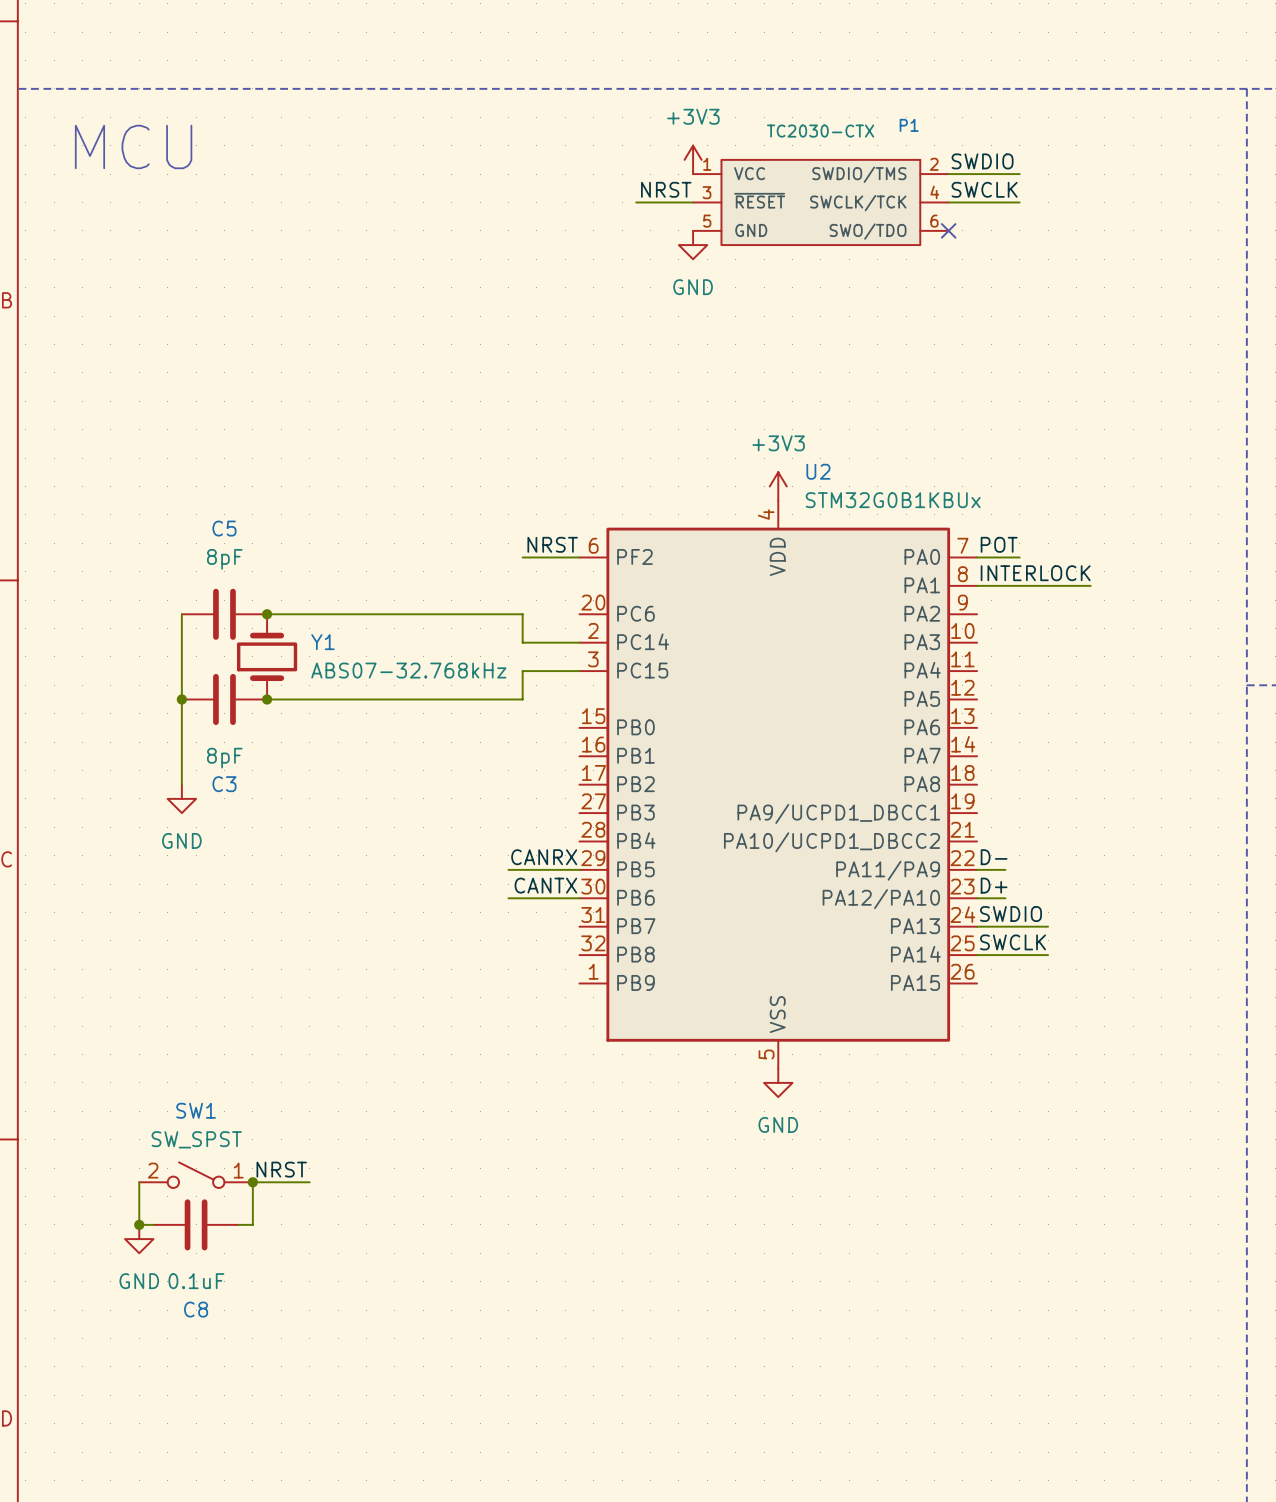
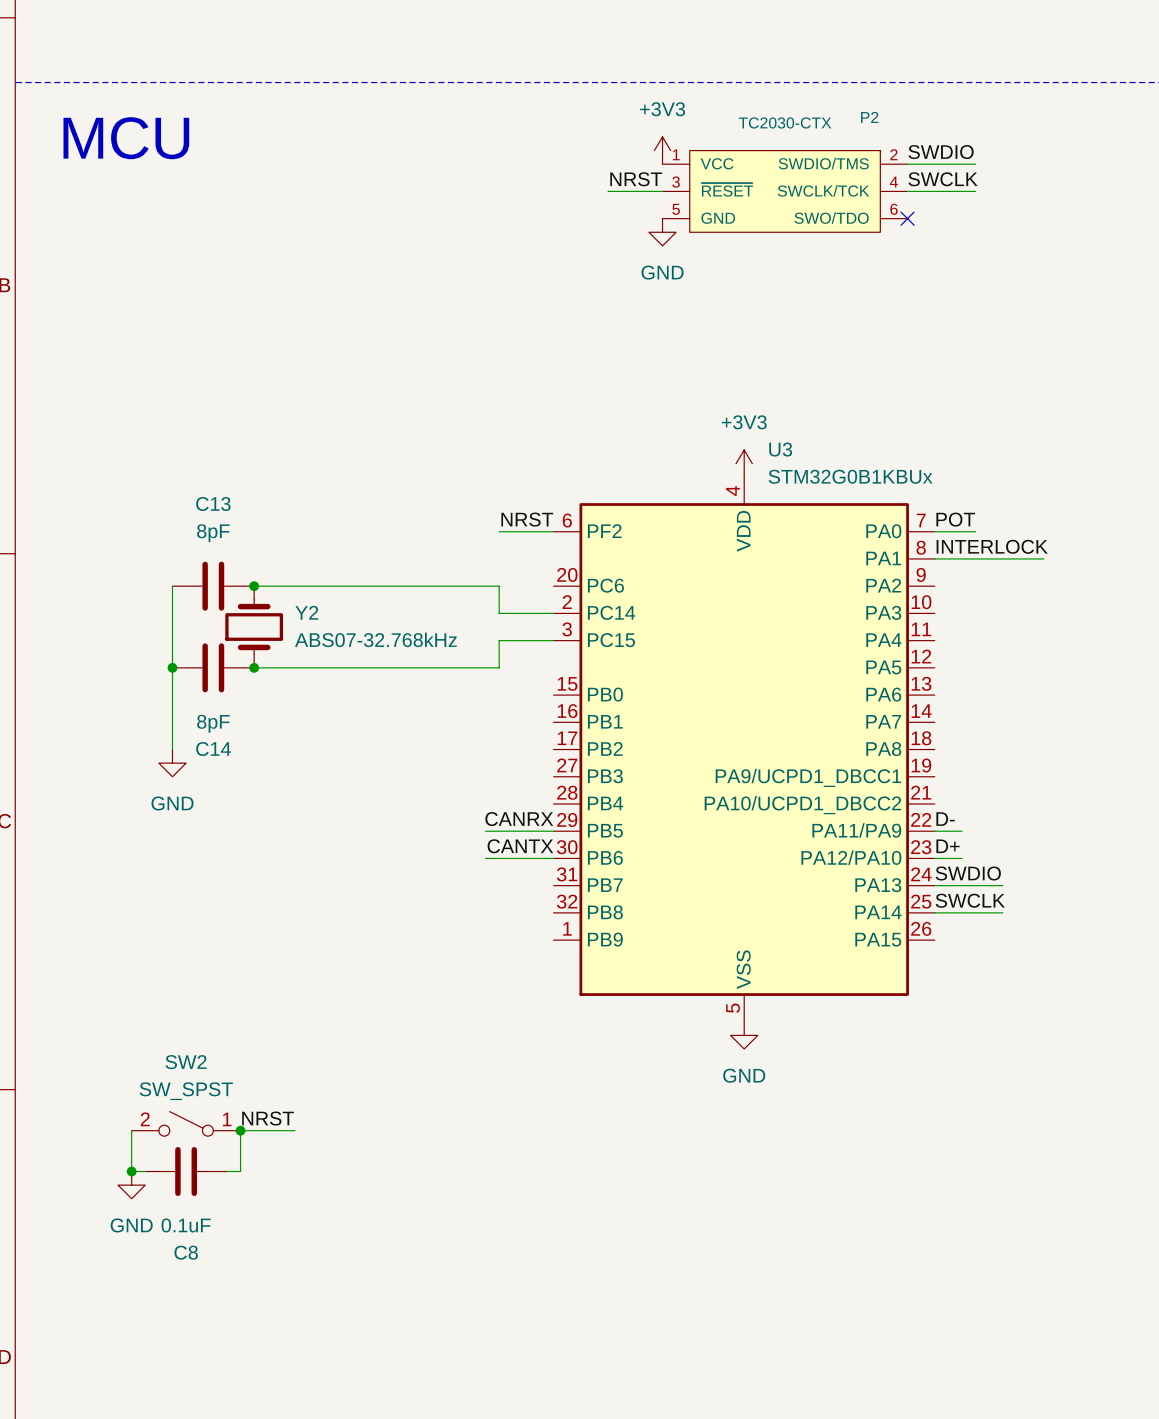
P1 name: P1 (909, 125) -> P2 (869, 117)
U2 name: U2 (818, 471) -> U3 (780, 449)
C5 name: C5 (224, 528) -> C13 (213, 504)
Y1 name: Y1 (322, 642) -> Y2 (306, 612)
C3 name: C3 (224, 784) -> C14 (213, 749)
SW1 name: SW1 (196, 1110) -> SW2 (186, 1062)

